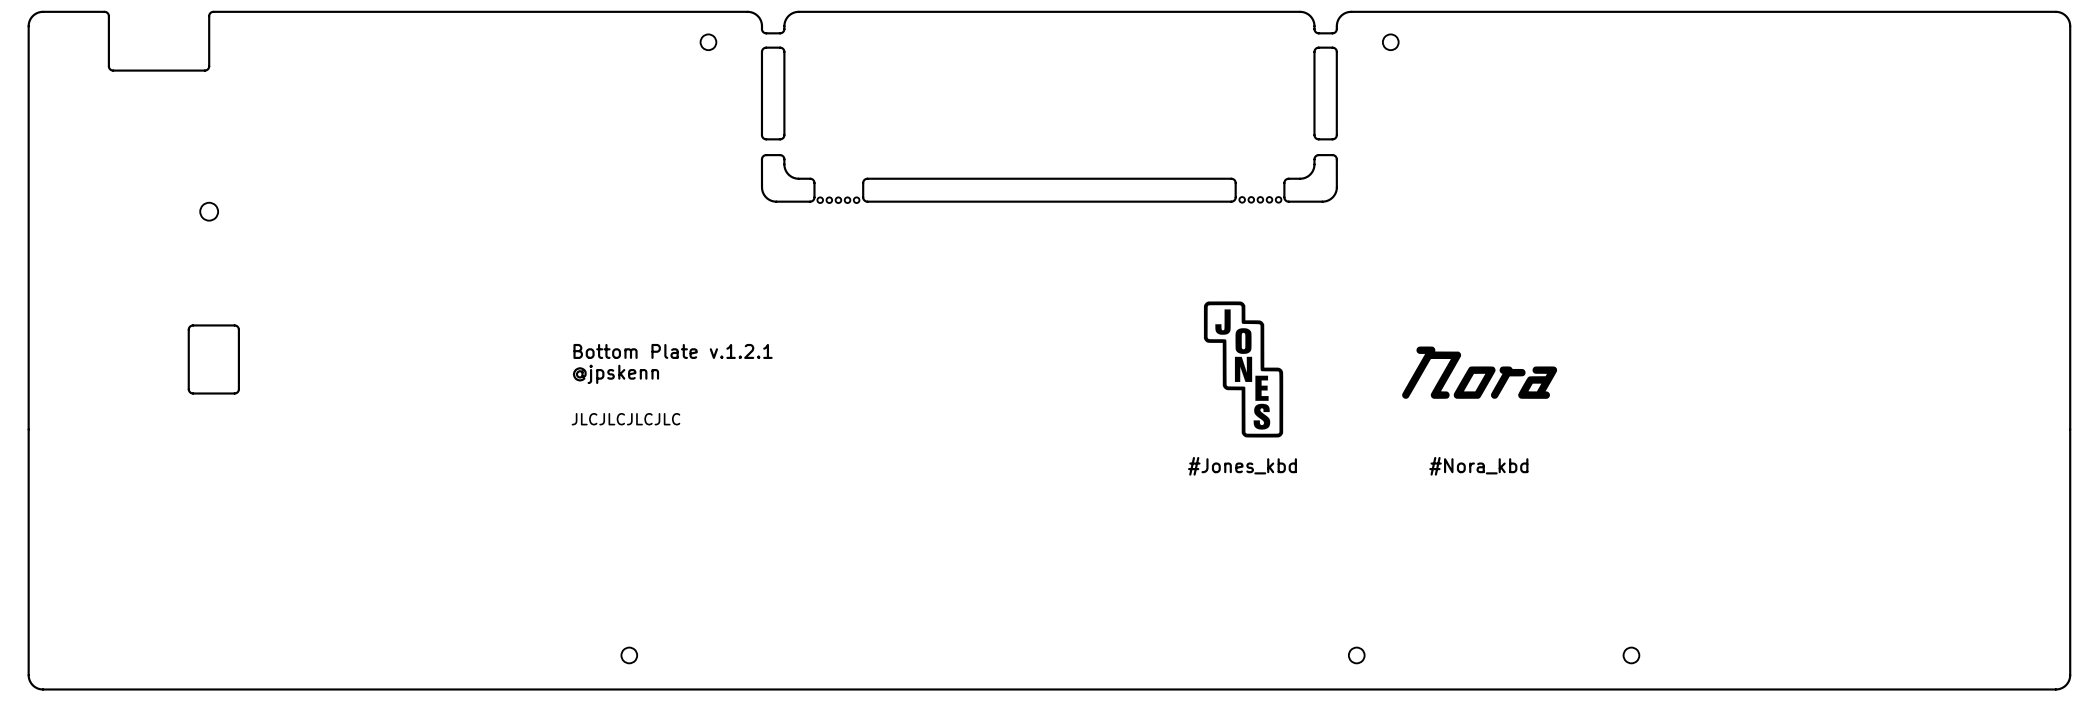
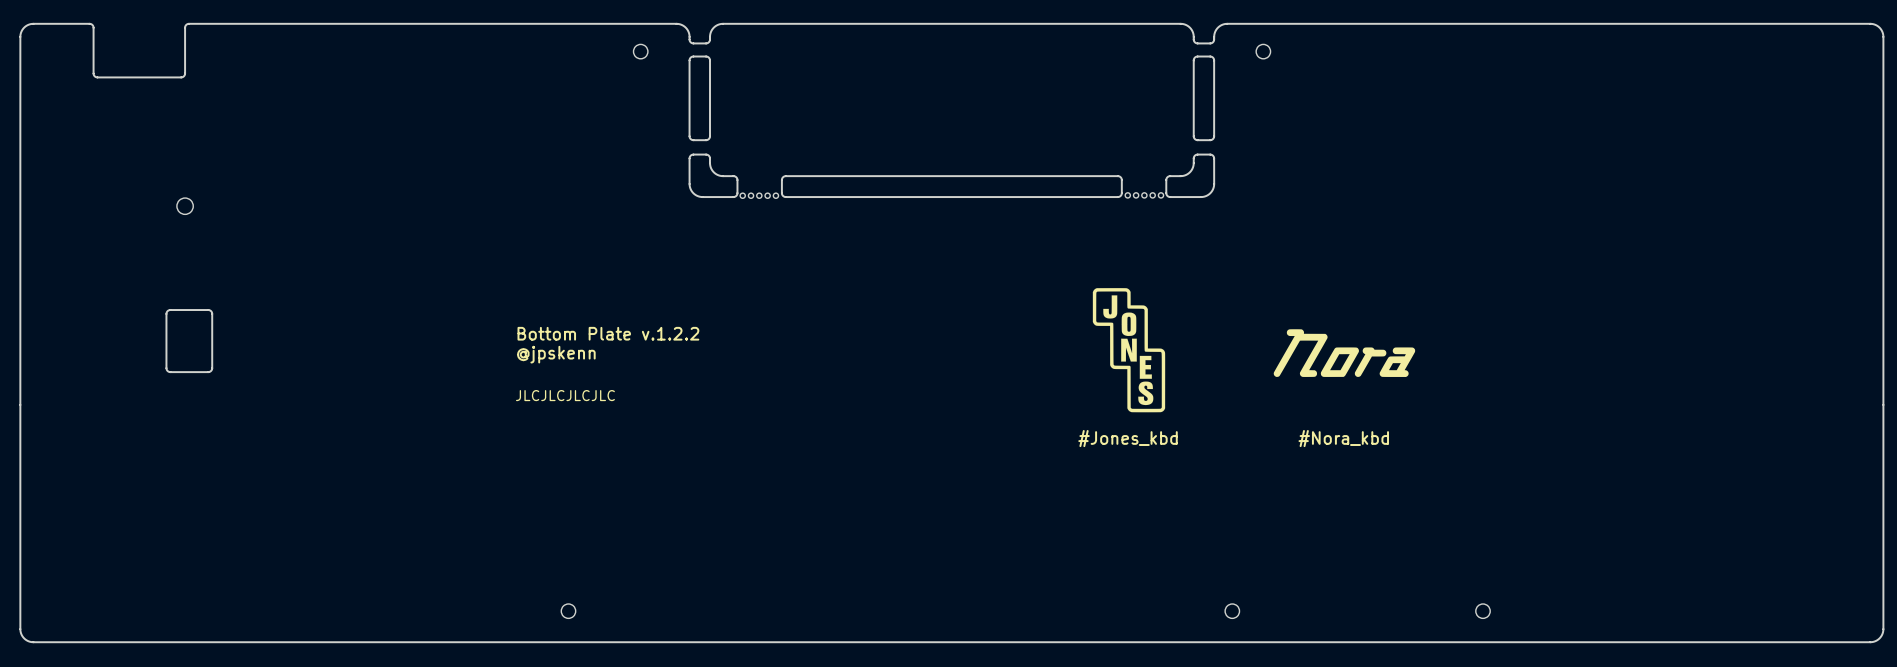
text: Bottom Plate v.1.2.1 (673, 351) -> Bottom Plate v.1.2.2 (608, 333)

